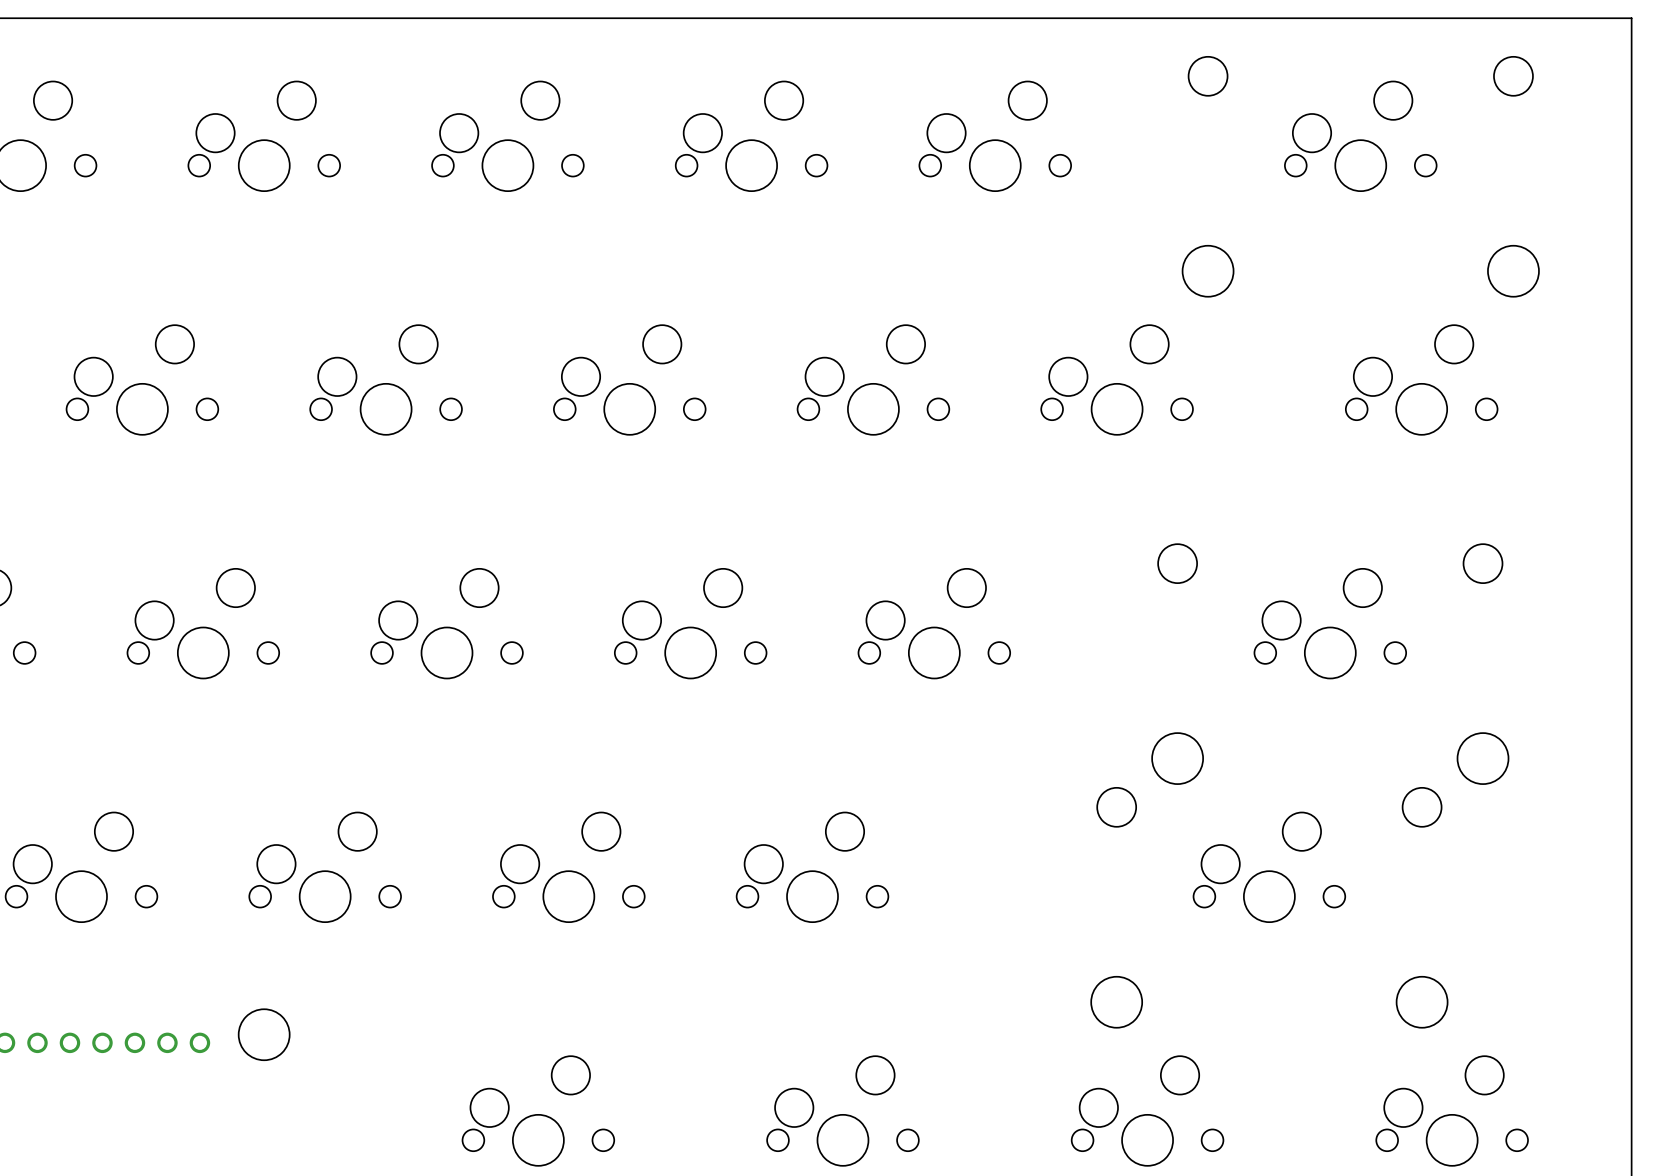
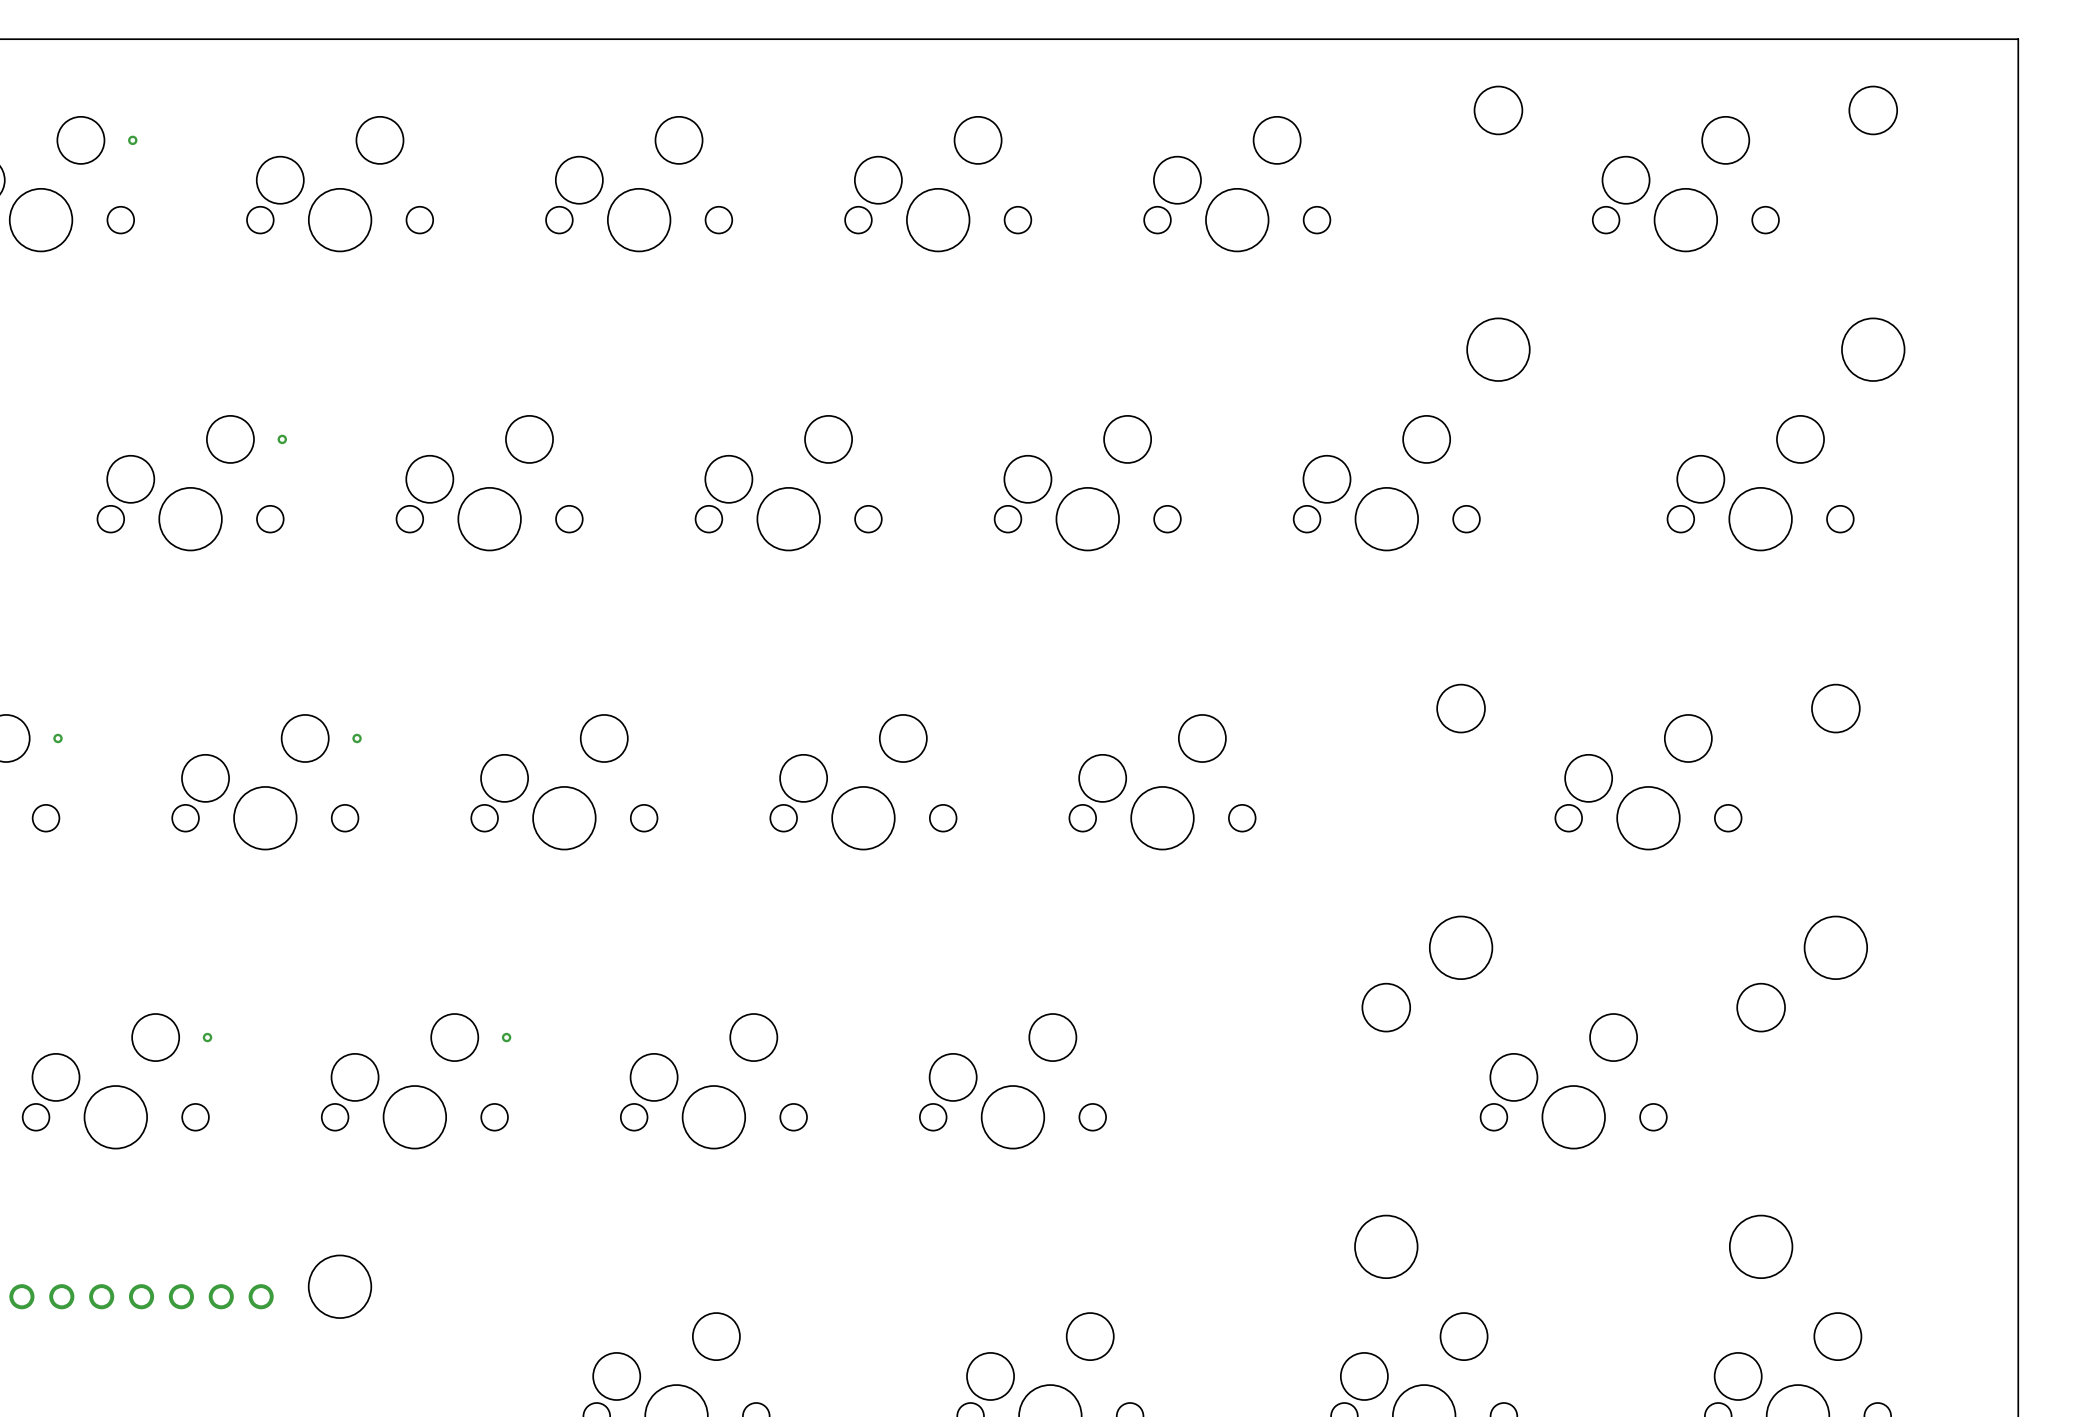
via: none -> (132, 140)
via: none -> (282, 439)
via: none -> (57, 738)
via: none -> (357, 738)
via: none -> (207, 1037)
via: none -> (506, 1037)

